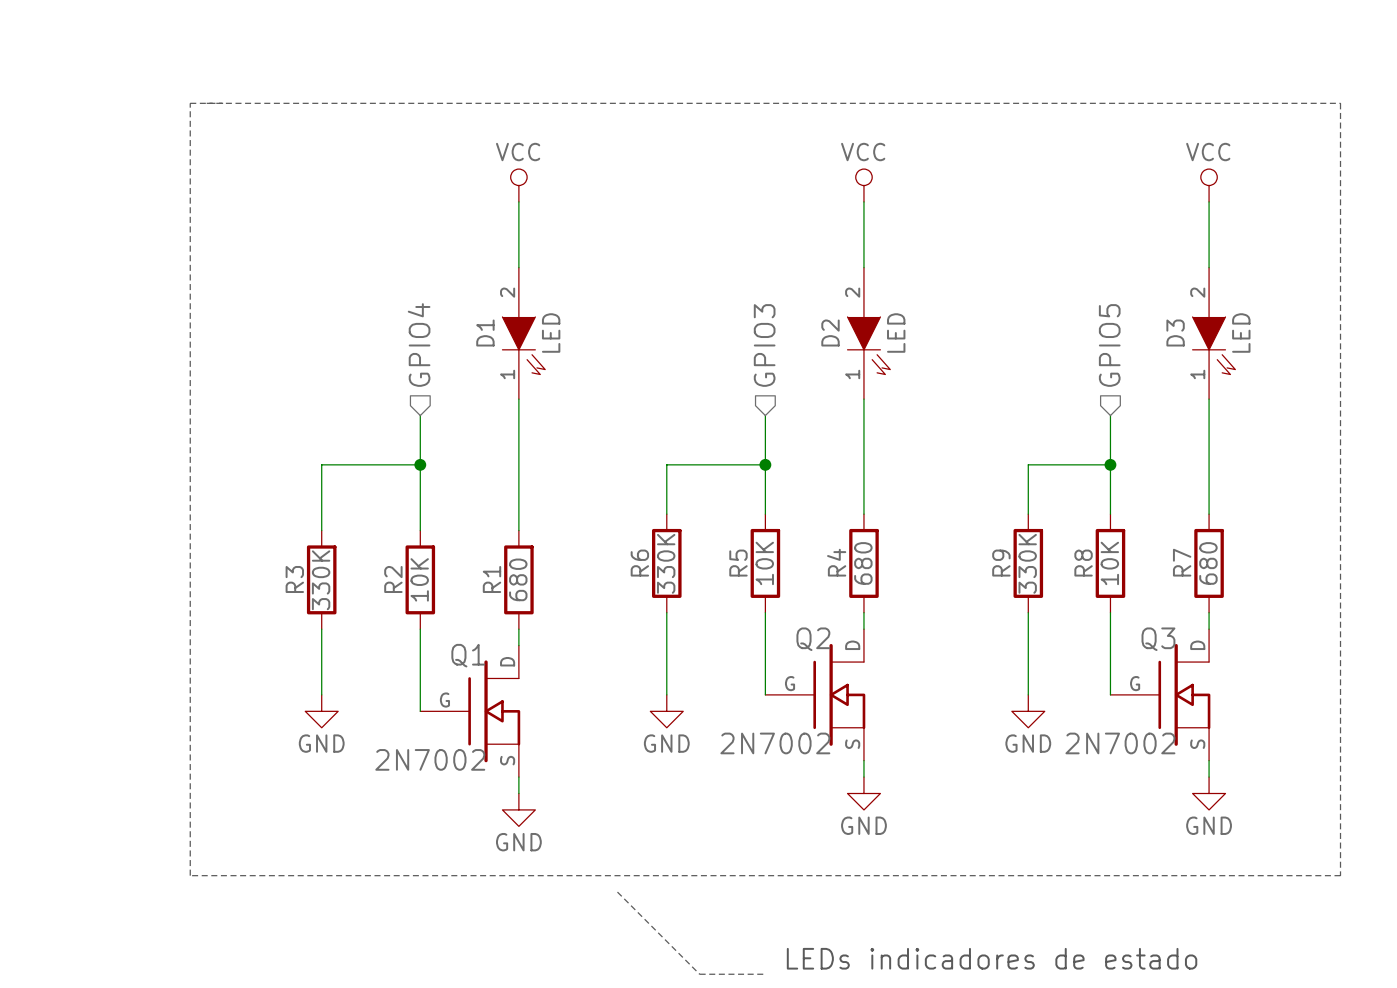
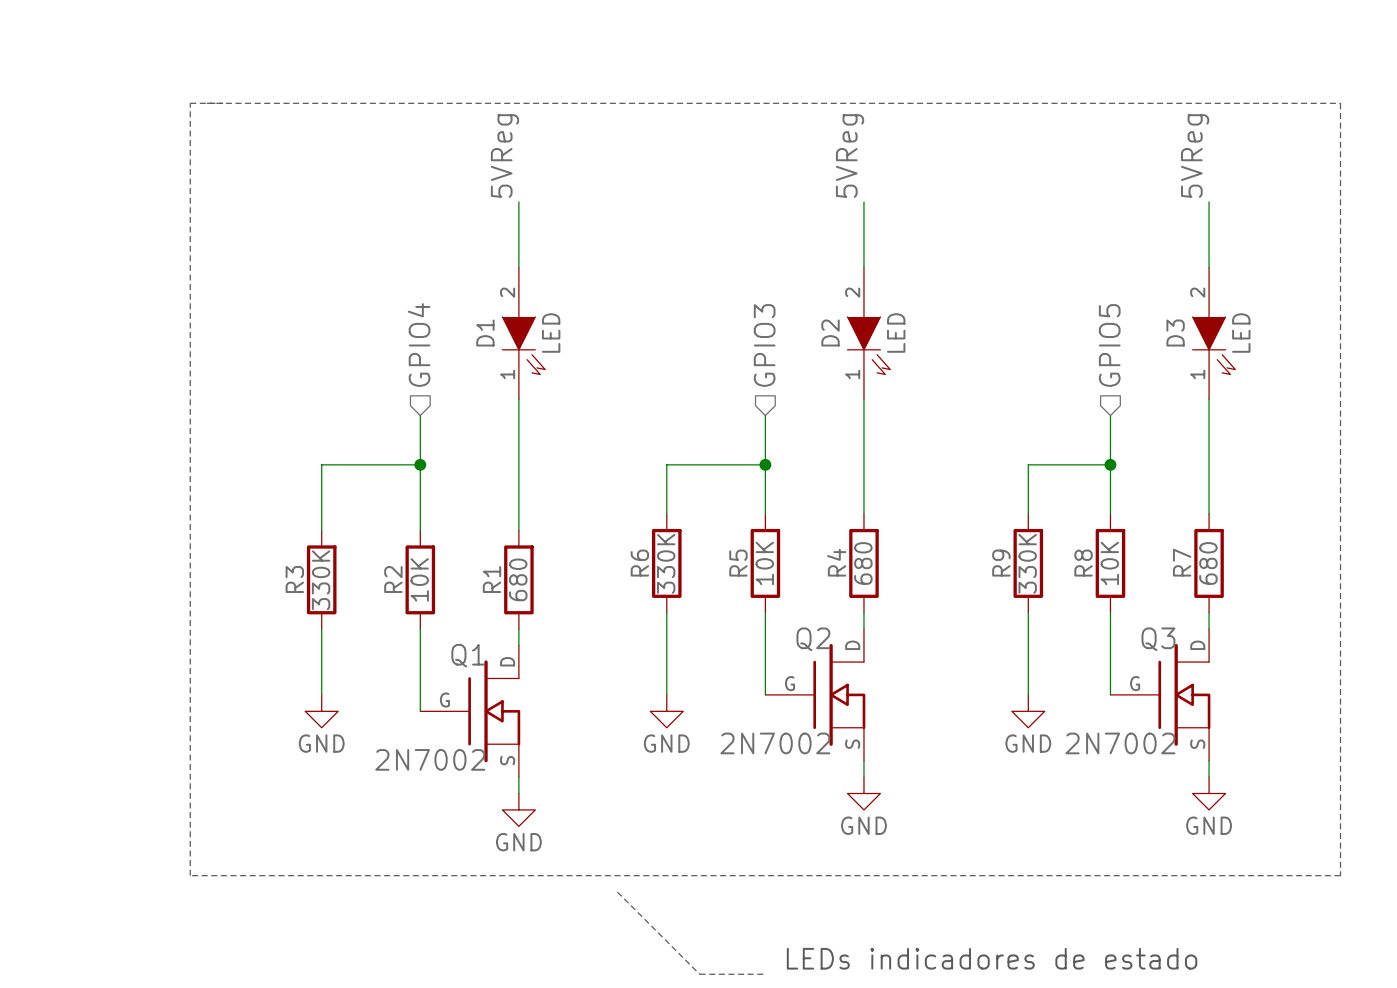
label: none -> 5VReg (504, 156)
label: none -> 5VReg (850, 156)
label: none -> 5VReg (1195, 156)
power symbol: VCC (518, 185) -> none
power symbol: VCC (863, 185) -> none
power symbol: VCC (1209, 185) -> none

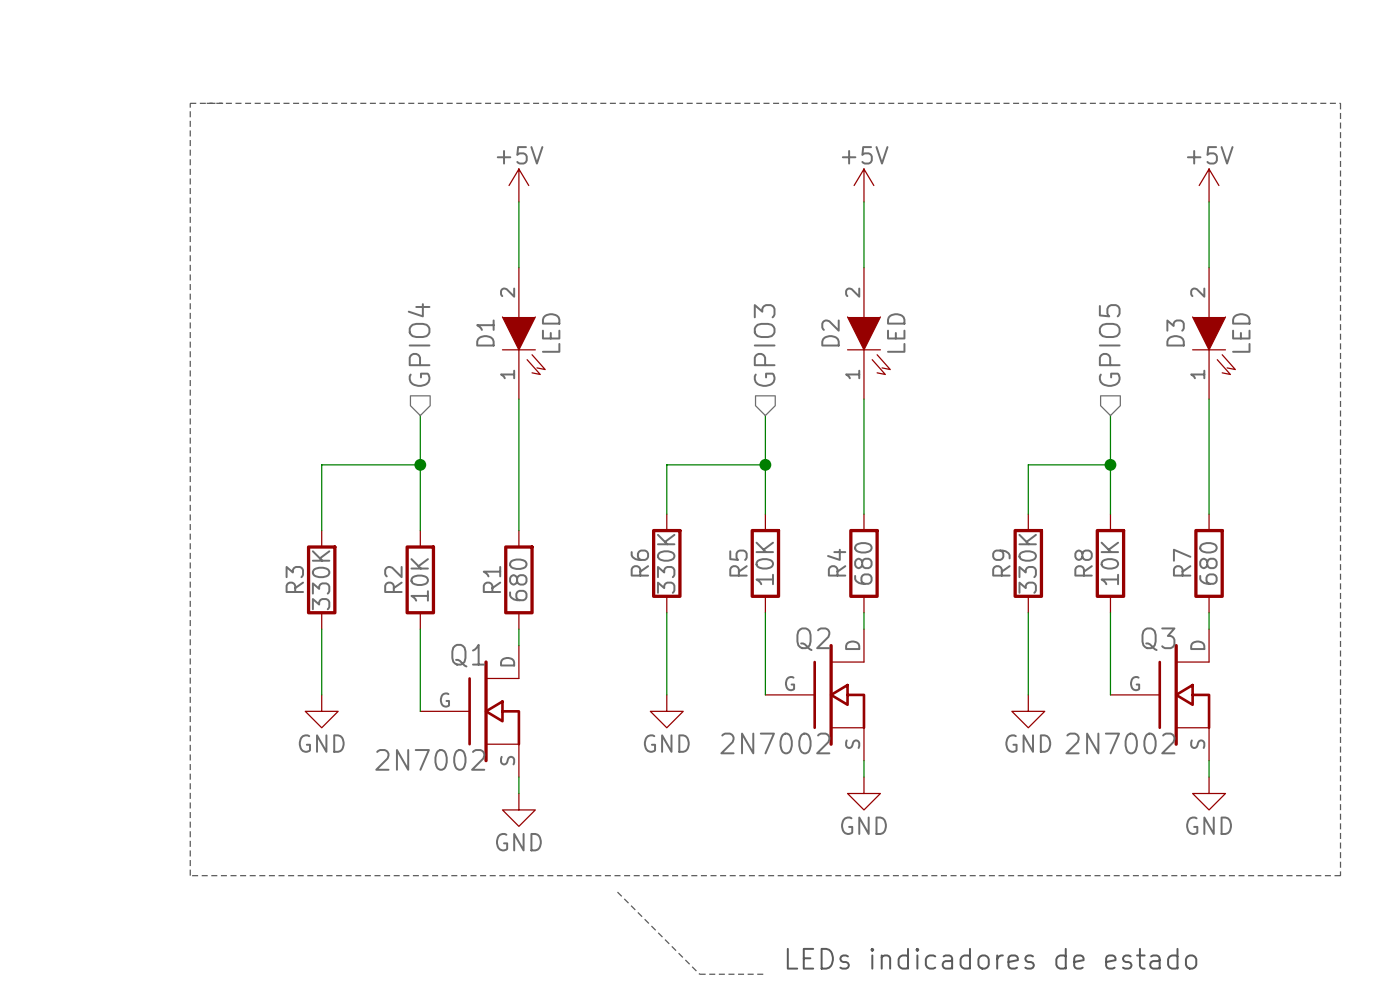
label: 5VReg (504, 156) -> none
label: 5VReg (850, 156) -> none
label: 5VReg (1195, 156) -> none
power symbol: none -> +5V (518, 185)
power symbol: none -> +5V (863, 185)
power symbol: none -> +5V (1209, 185)

